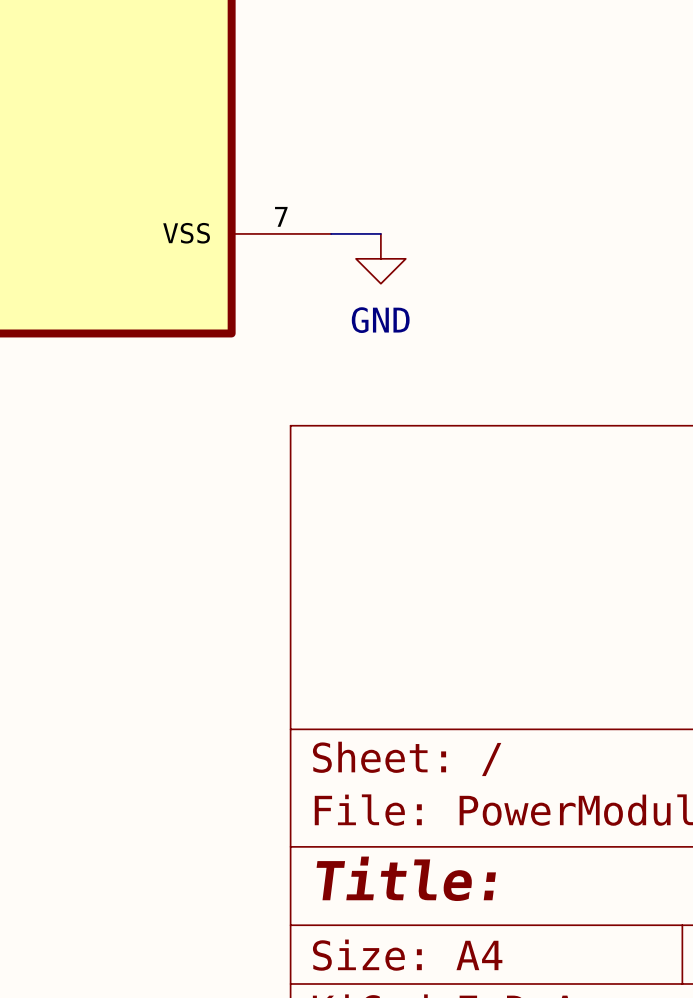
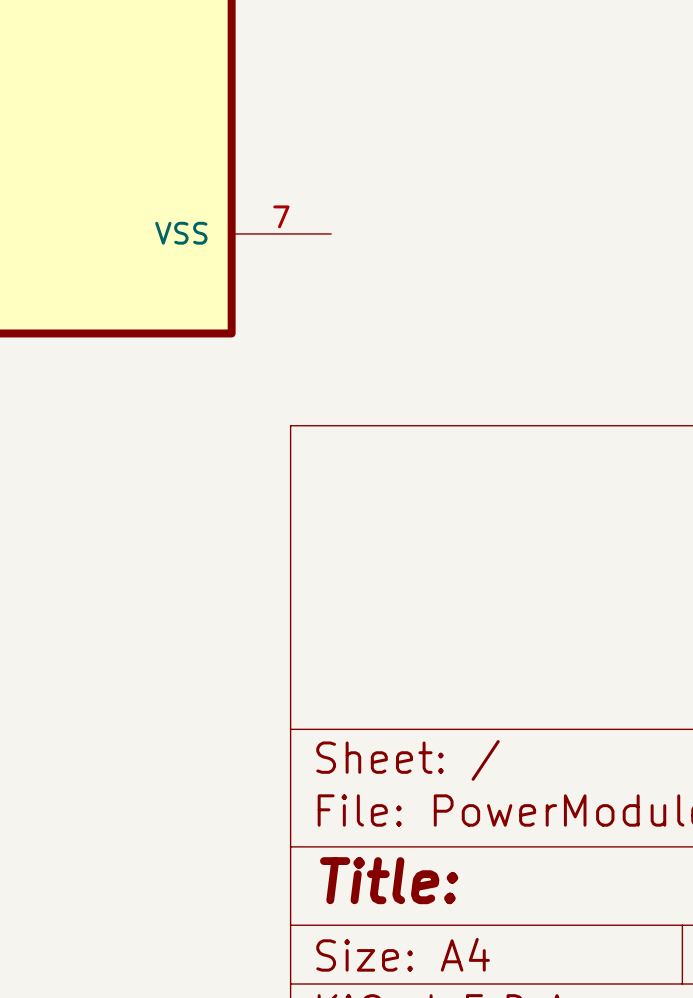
wire: (331, 233) (380, 233) -> none
power symbol: GND (380, 258) -> none

